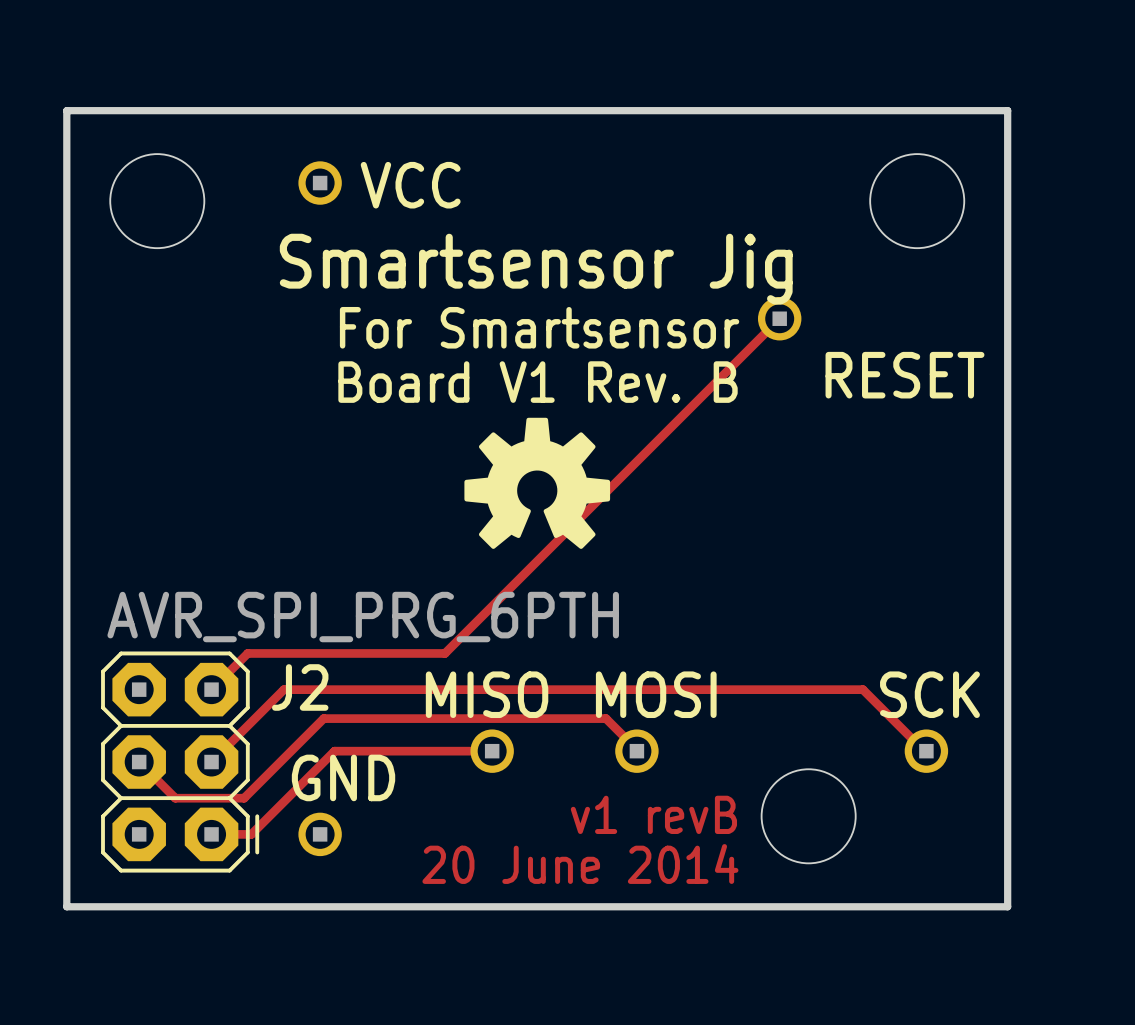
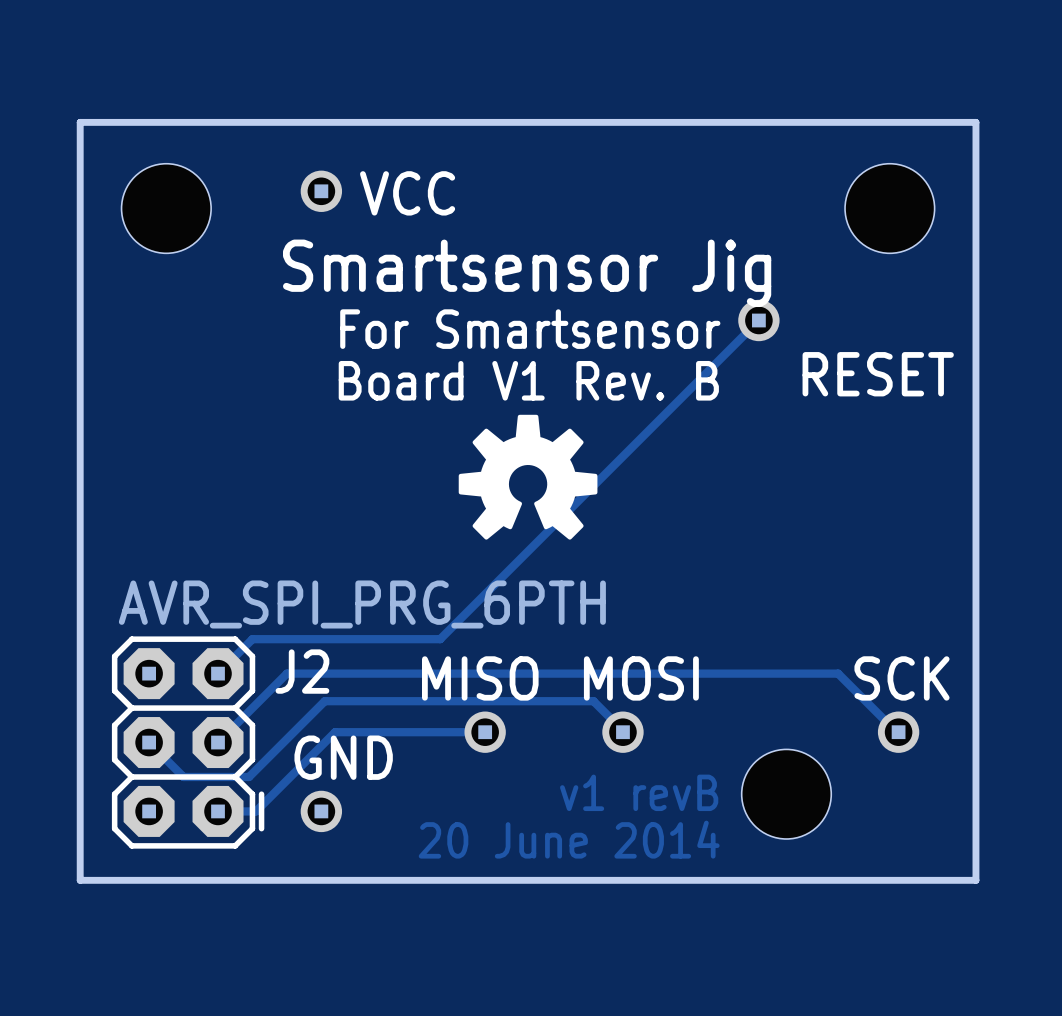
J2 footprint: [101, 651, 260, 873] -> [111, 636, 265, 849]

